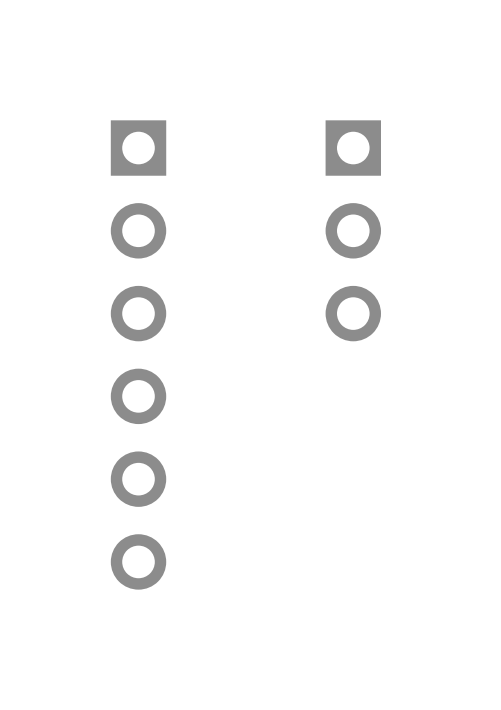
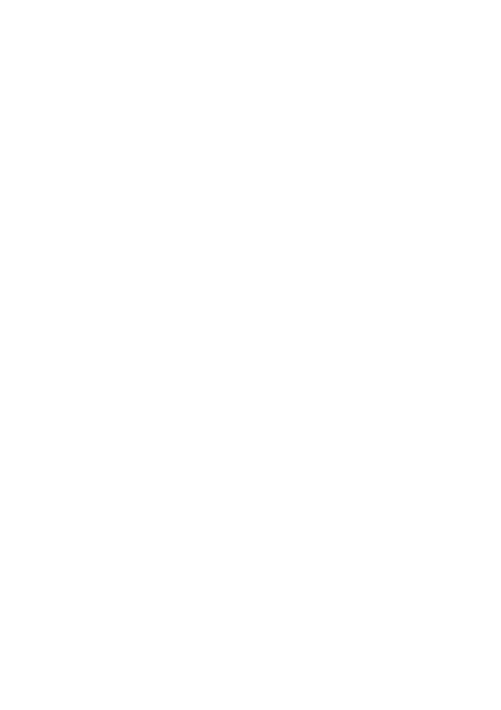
part: (353, 230) -> none
part: (138, 354) -> none

